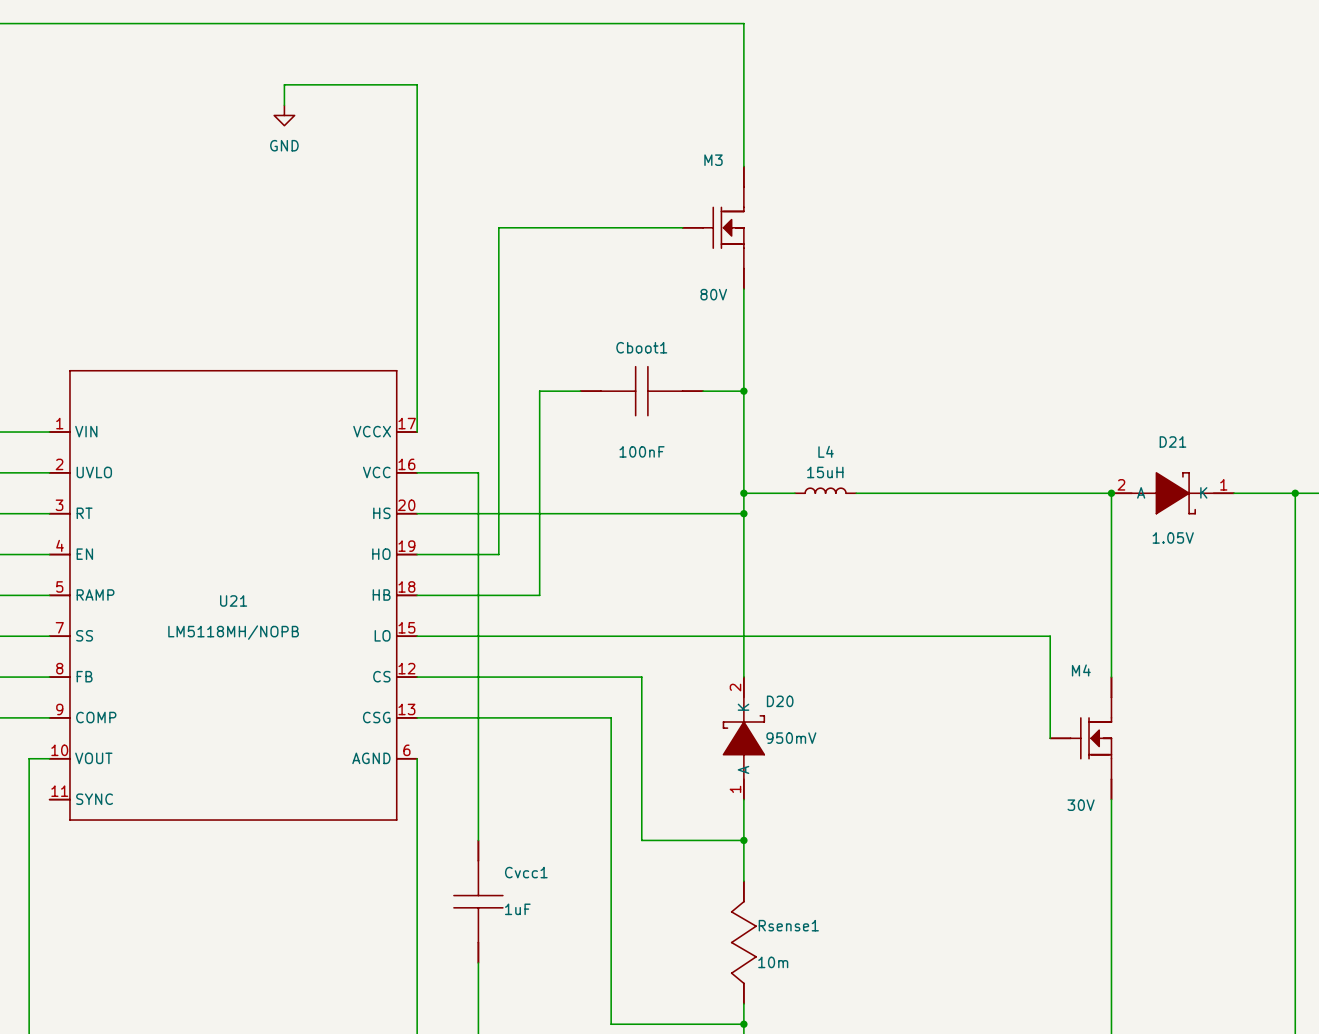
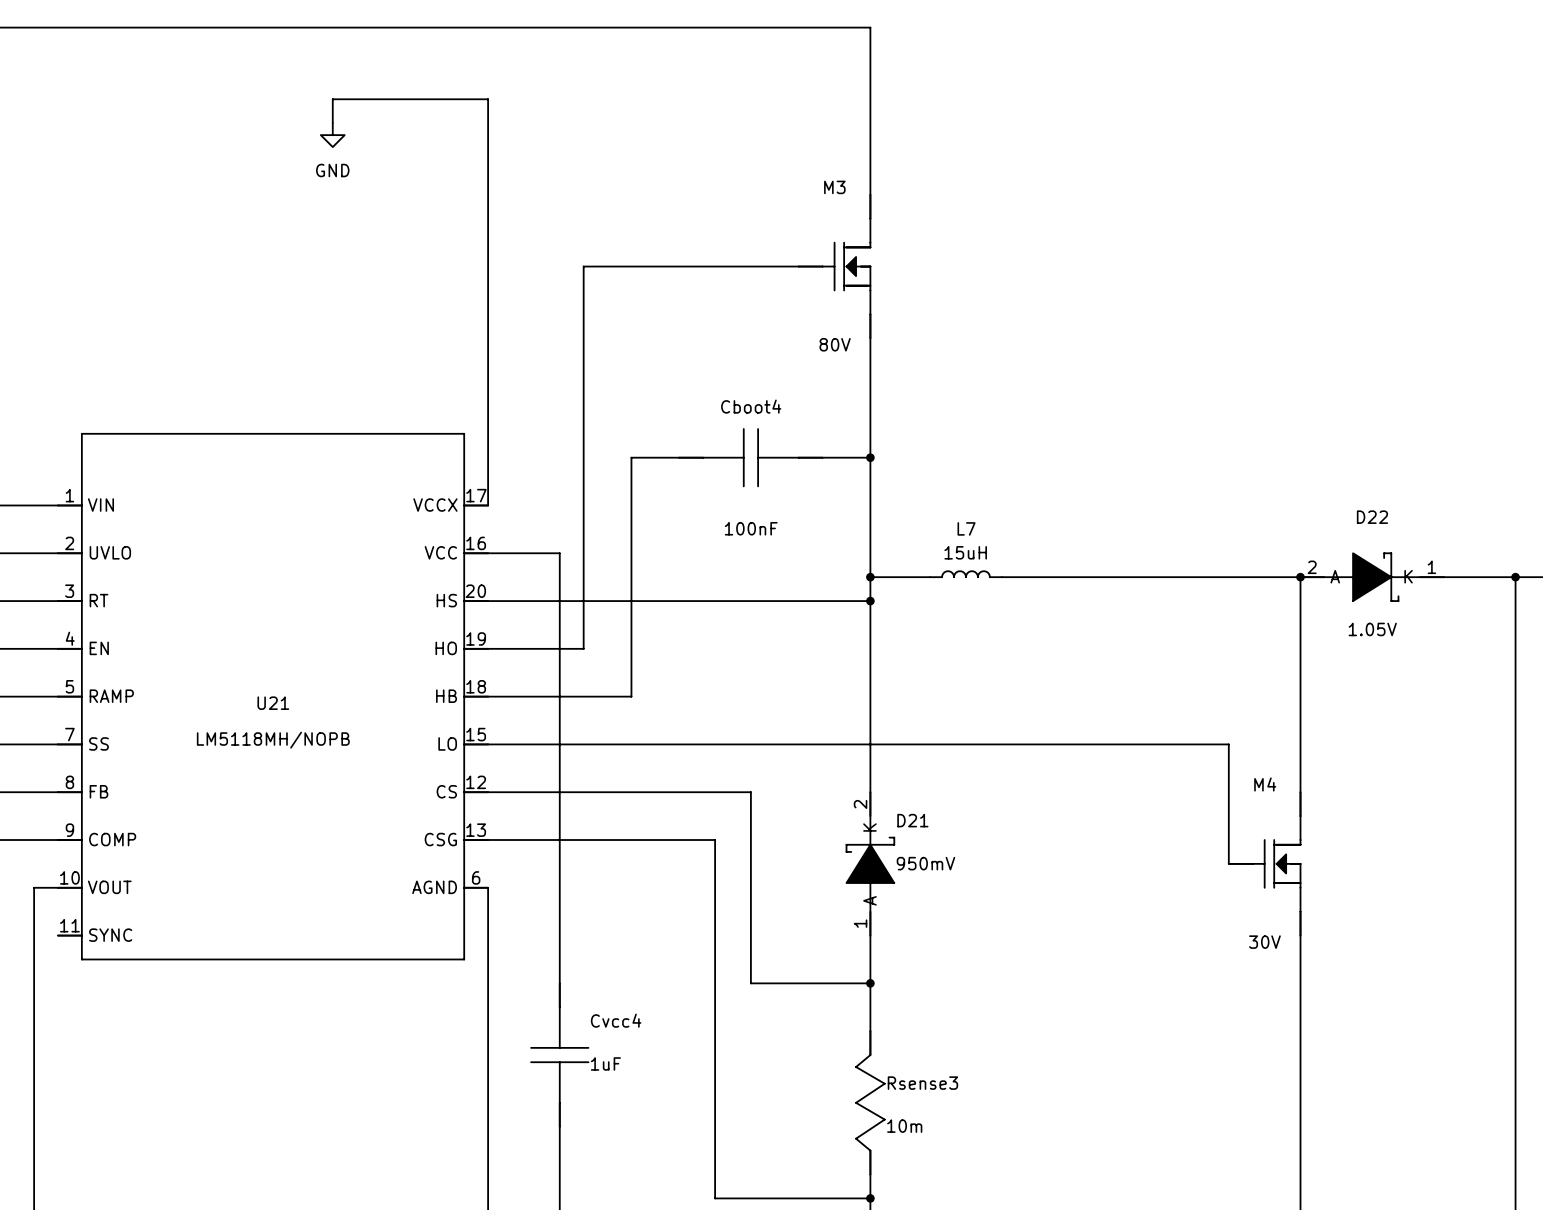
Cboot1 name: Cboot1 (641, 347) -> Cboot4 (751, 406)
D21 name: D21 (1172, 441) -> D22 (1372, 517)
L4 name: L4 (826, 451) -> L7 (966, 528)
D20 name: D20 (780, 701) -> D21 (912, 820)
Cvcc1 name: Cvcc1 (526, 872) -> Cvcc4 (616, 1020)
Rsense1 name: Rsense1 (788, 925) -> Rsense3 (922, 1083)

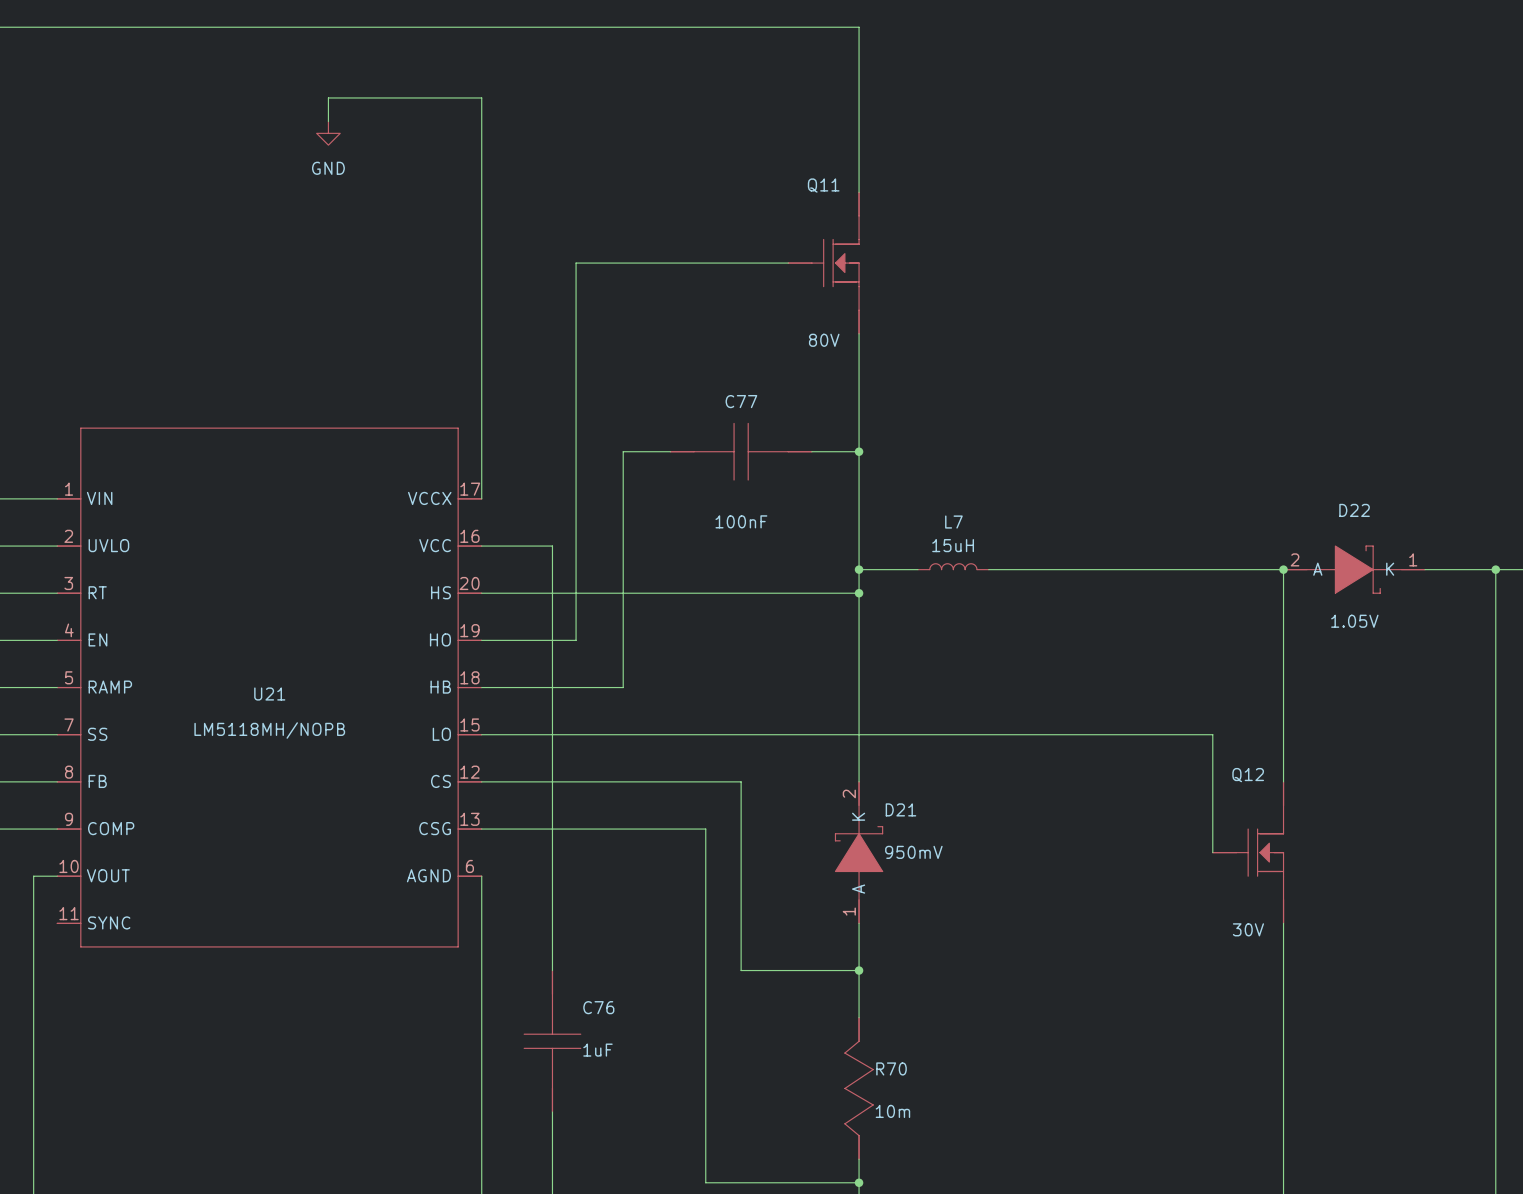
M3 name: M3 (834, 187) -> Q11 (823, 185)
Cboot4 name: Cboot4 (751, 406) -> C77 (741, 401)
M4 name: M4 (1265, 784) -> Q12 (1248, 775)
Cvcc4 name: Cvcc4 (616, 1020) -> C76 (598, 1007)
Rsense3 name: Rsense3 (922, 1083) -> R70 (891, 1068)

